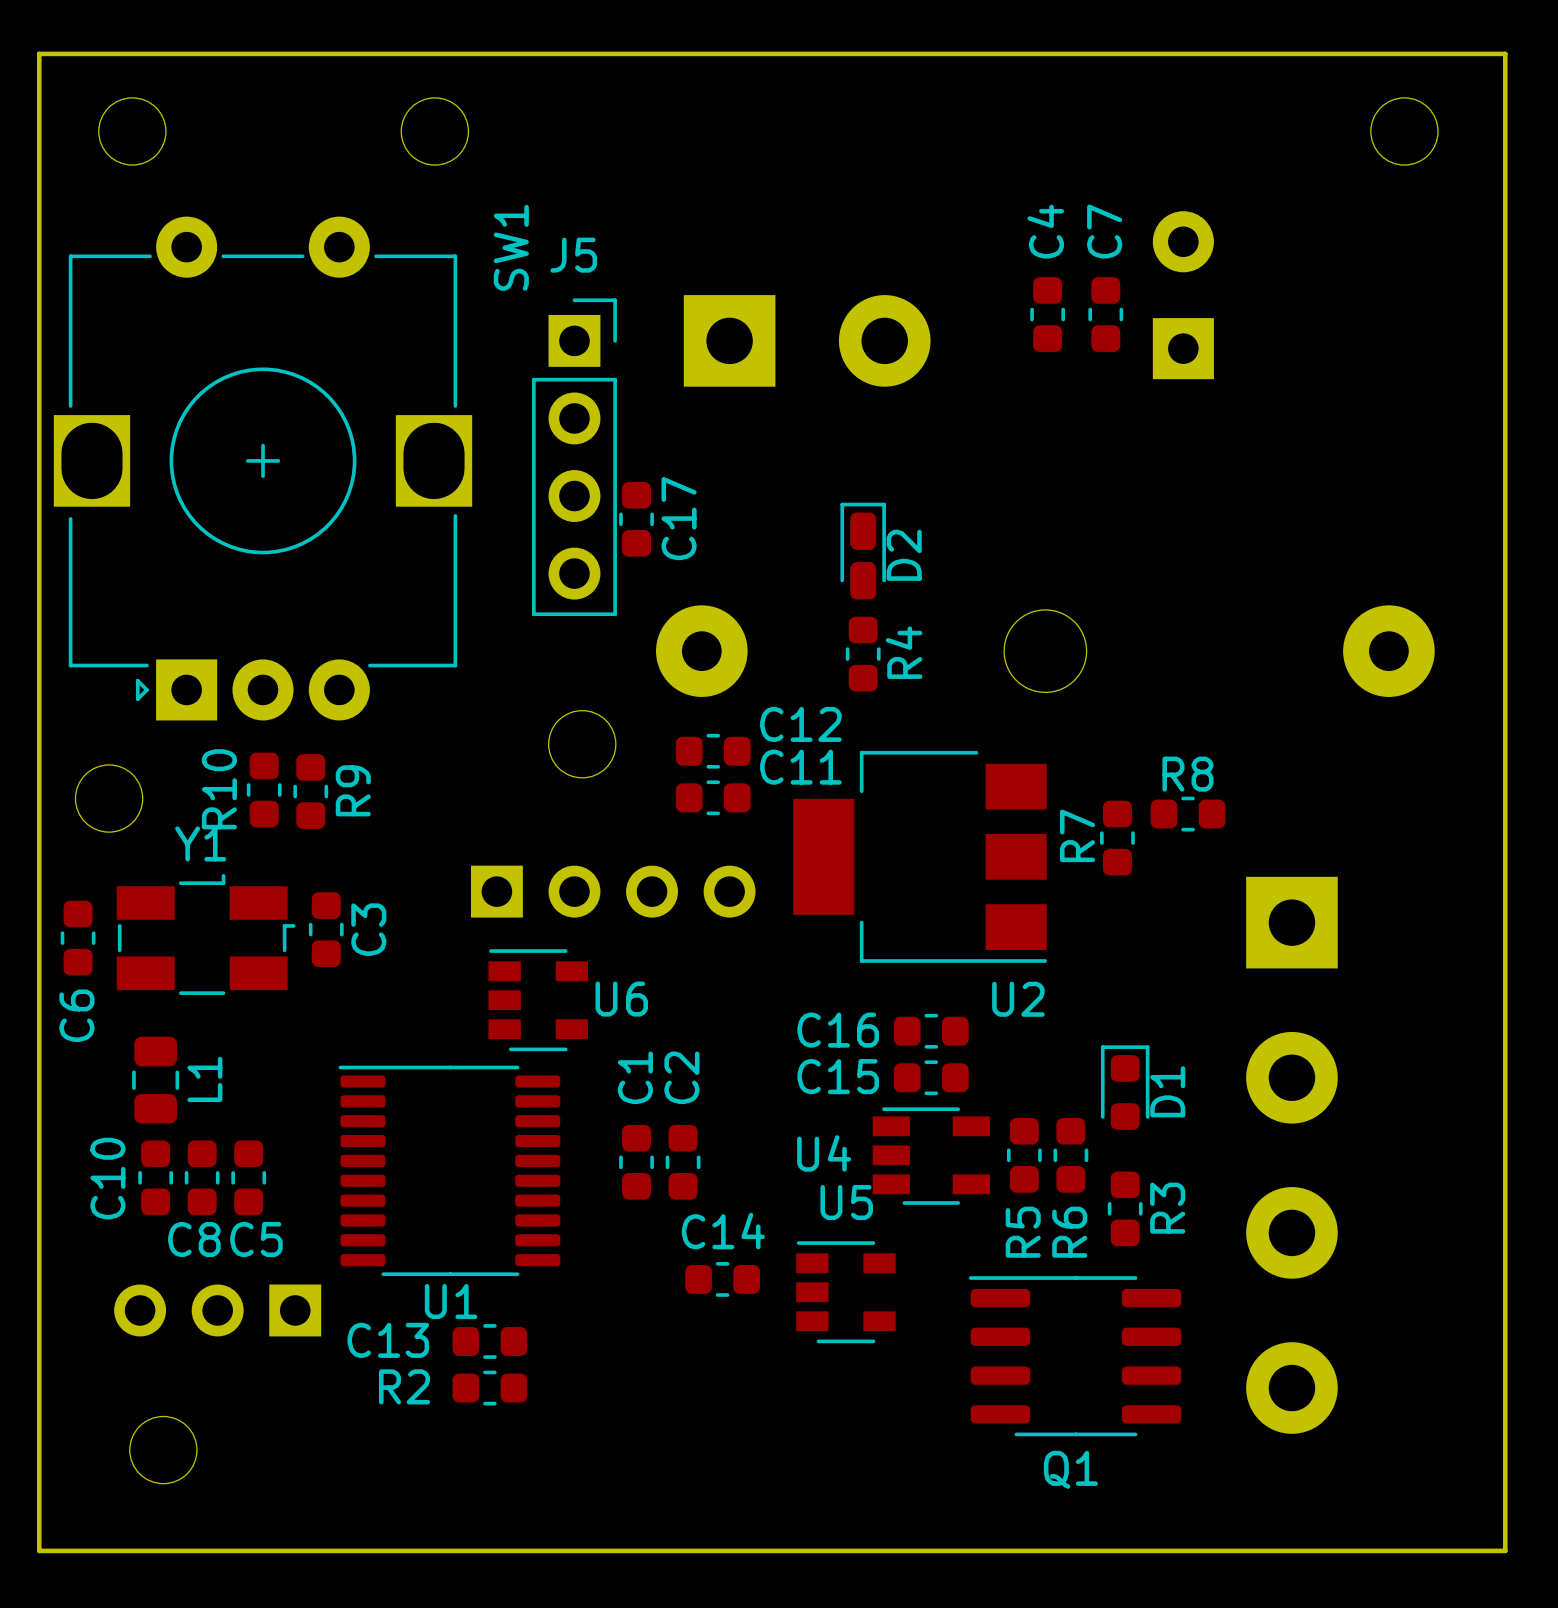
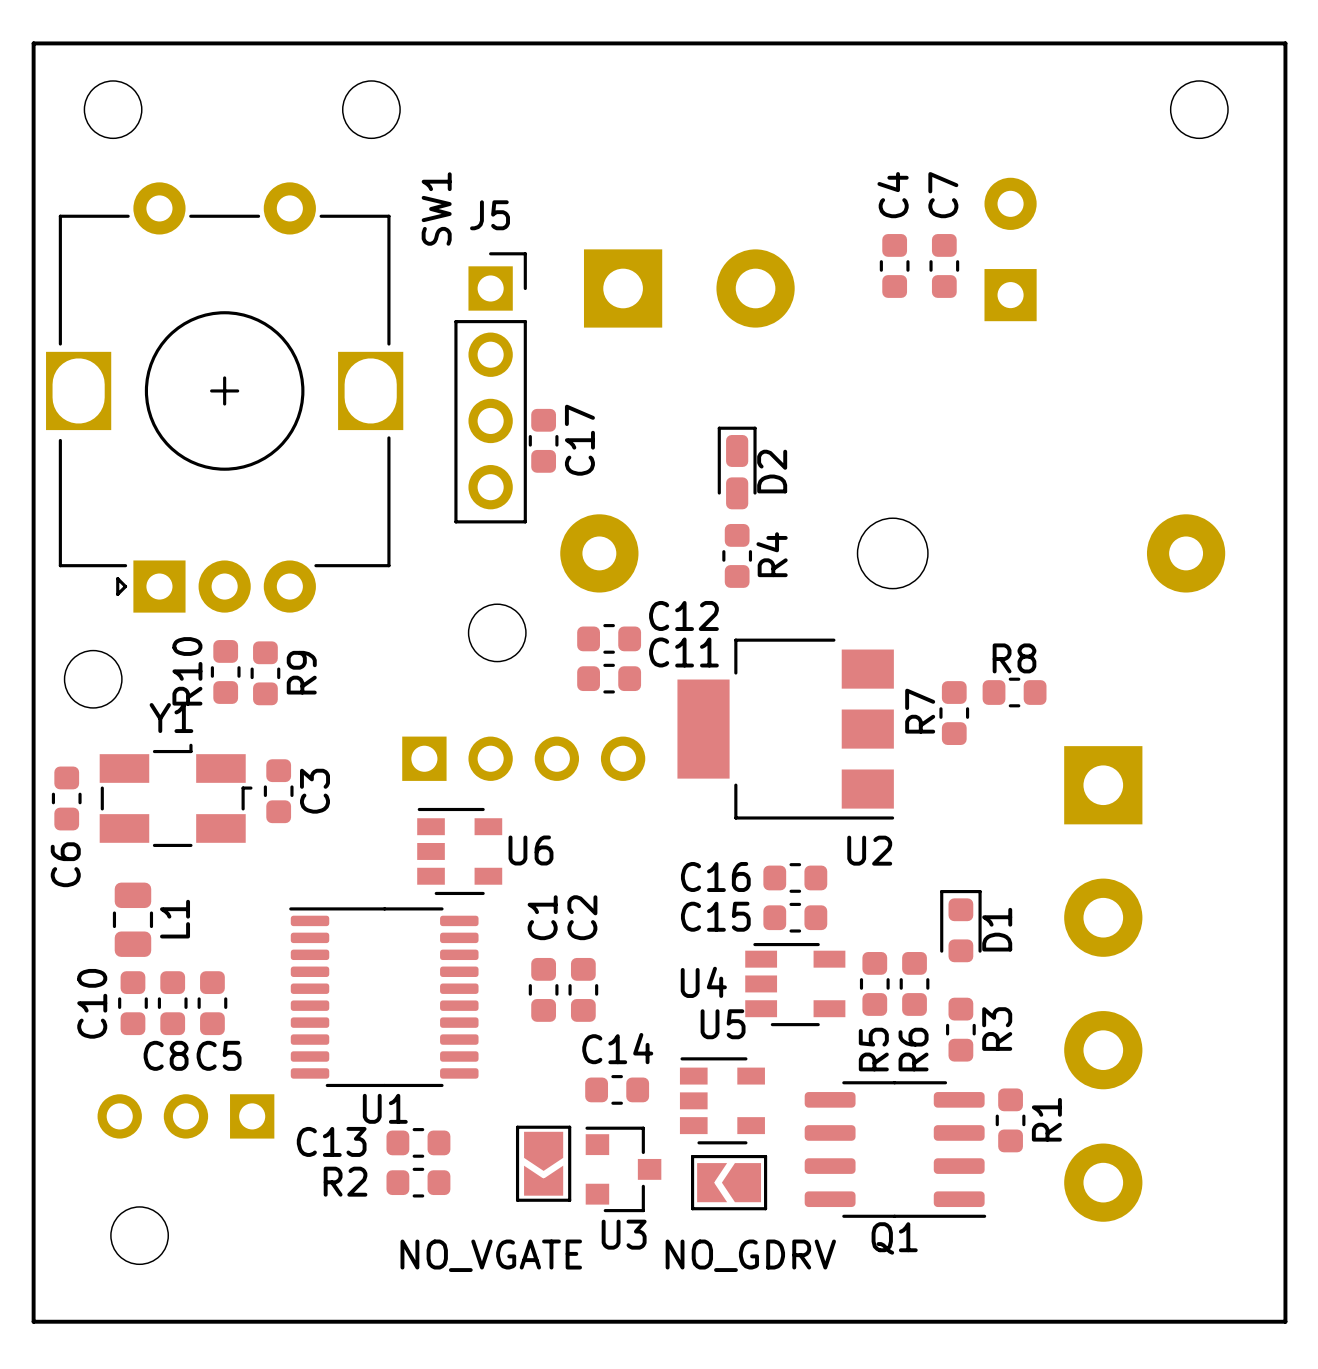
R1: none -> (1010, 1120)
Q1 rotation: 0° (1075, 1356) -> 180° (895, 1149)
part: none -> (543, 1163)
U3: none -> (623, 1169)
part: none -> (729, 1182)
text: none -> NO_VGATE (491, 1255)
text: none -> NO_GDRV (750, 1255)

